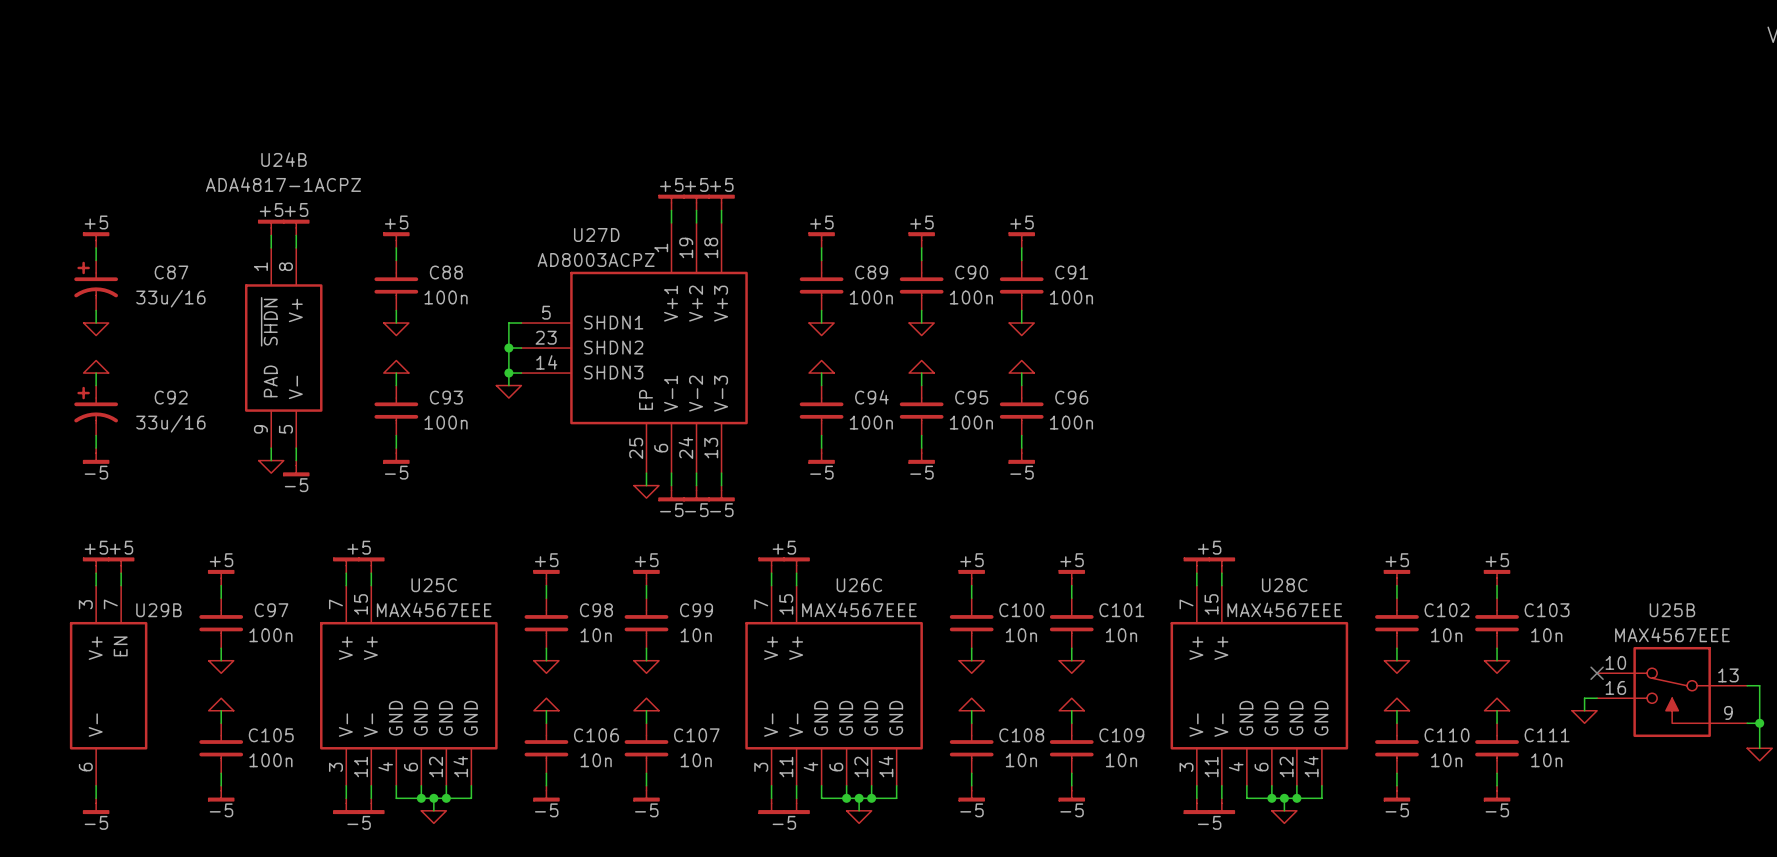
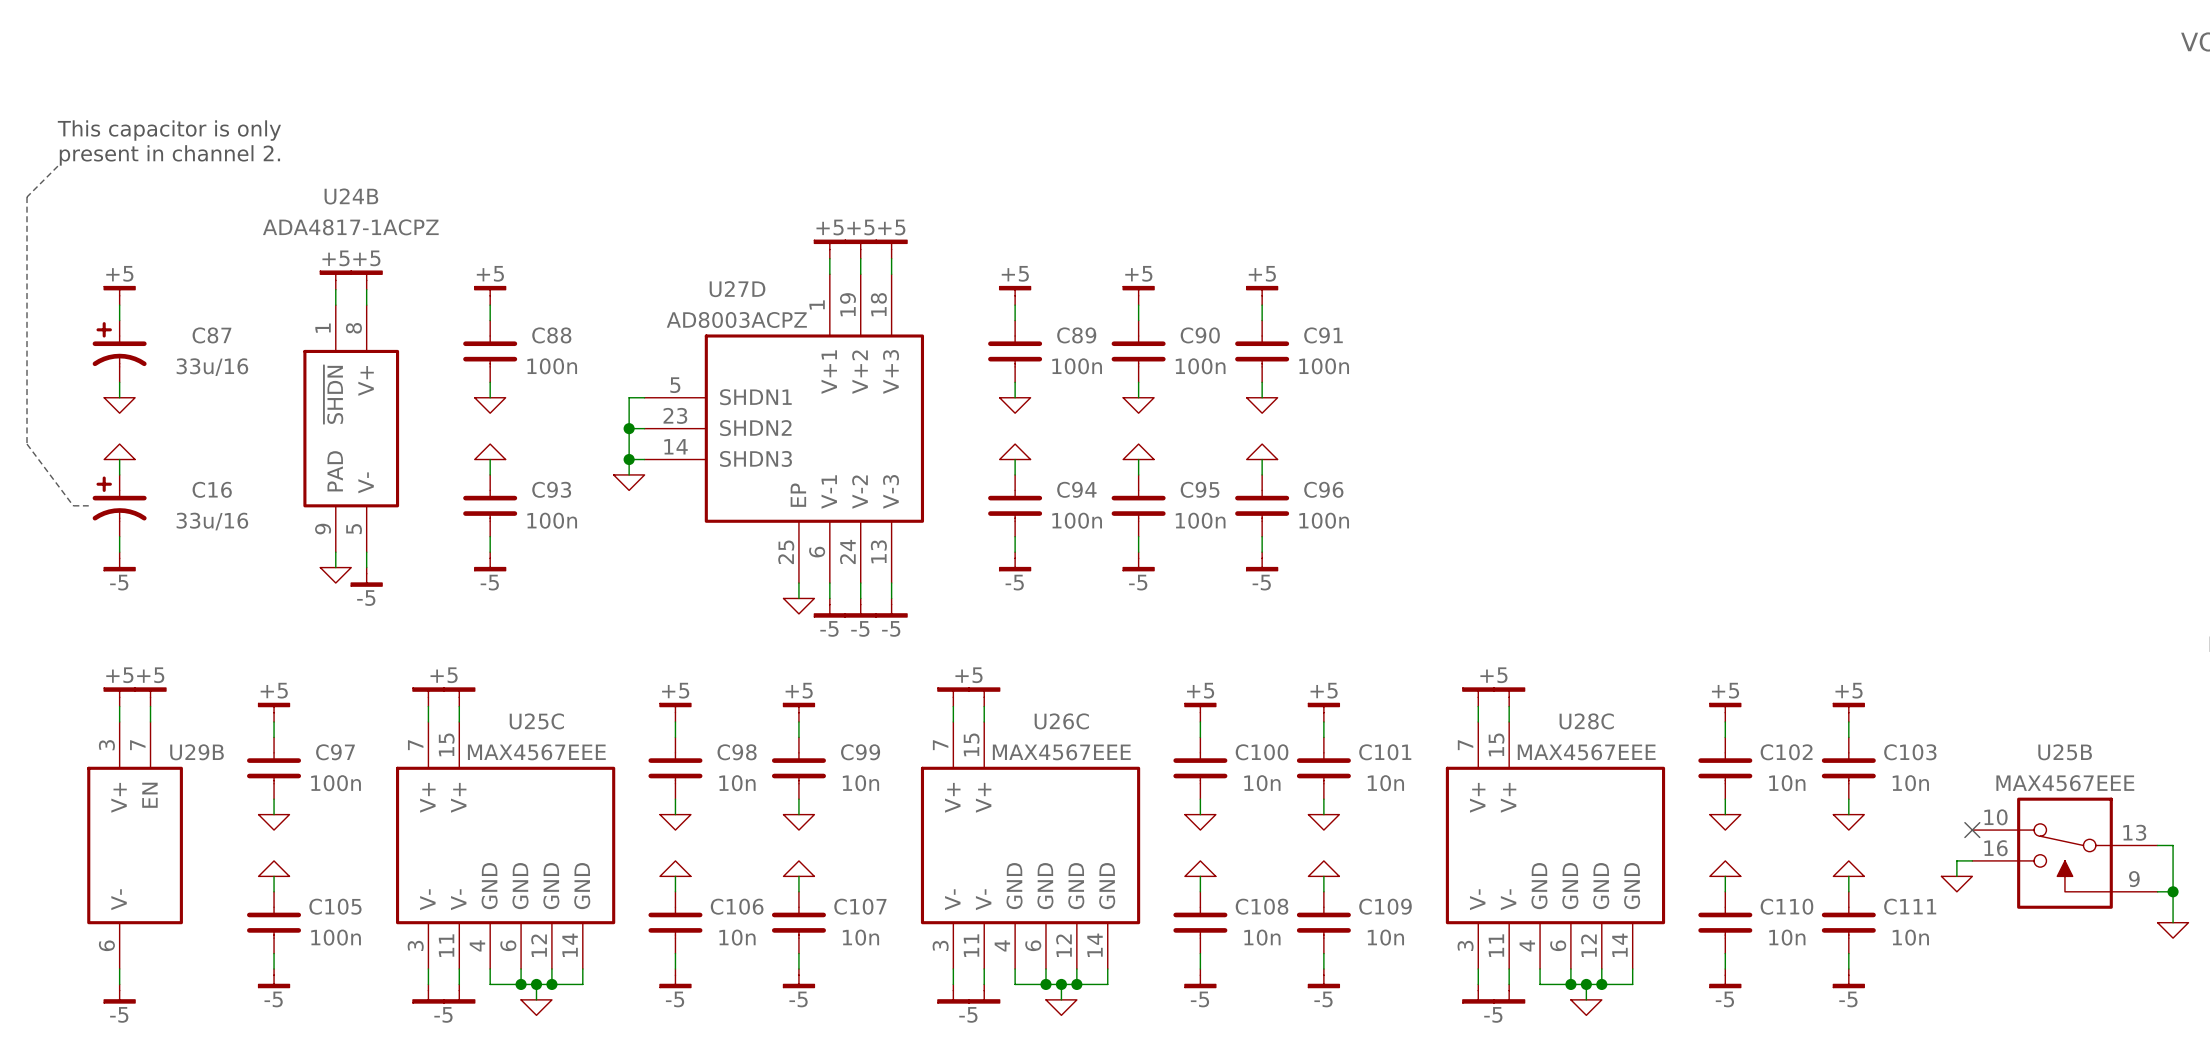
text: none -> This capacitor is only (169, 130)
text: none -> present in channel 2. (169, 155)
line: none -> (57, 166) (27, 197) (27, 444) (73, 505) (88, 505)
C92 name: C92 (171, 397) -> C16 (212, 489)

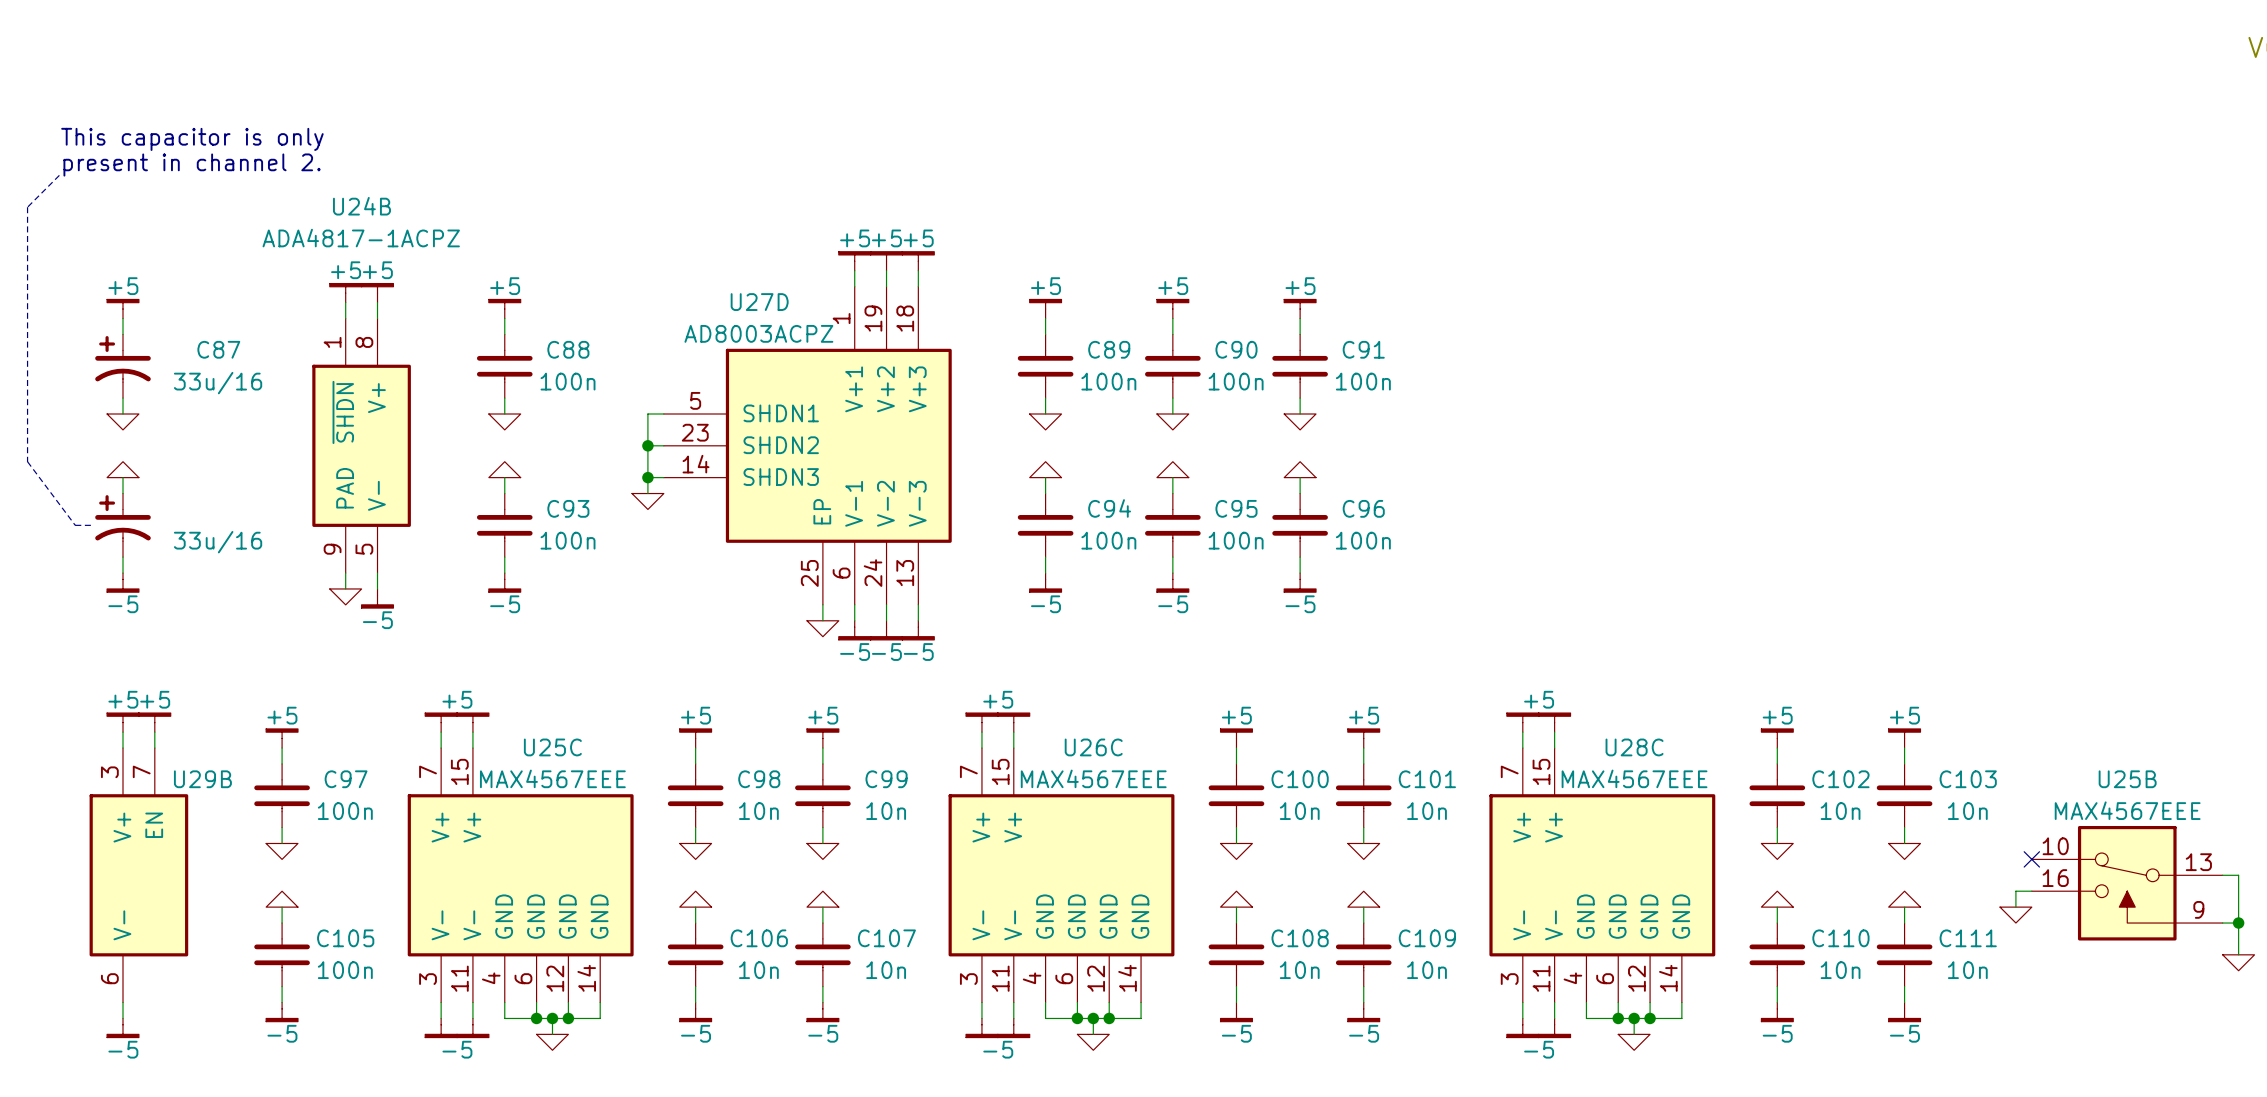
C16: 33u/16 (119, 505) -> none

